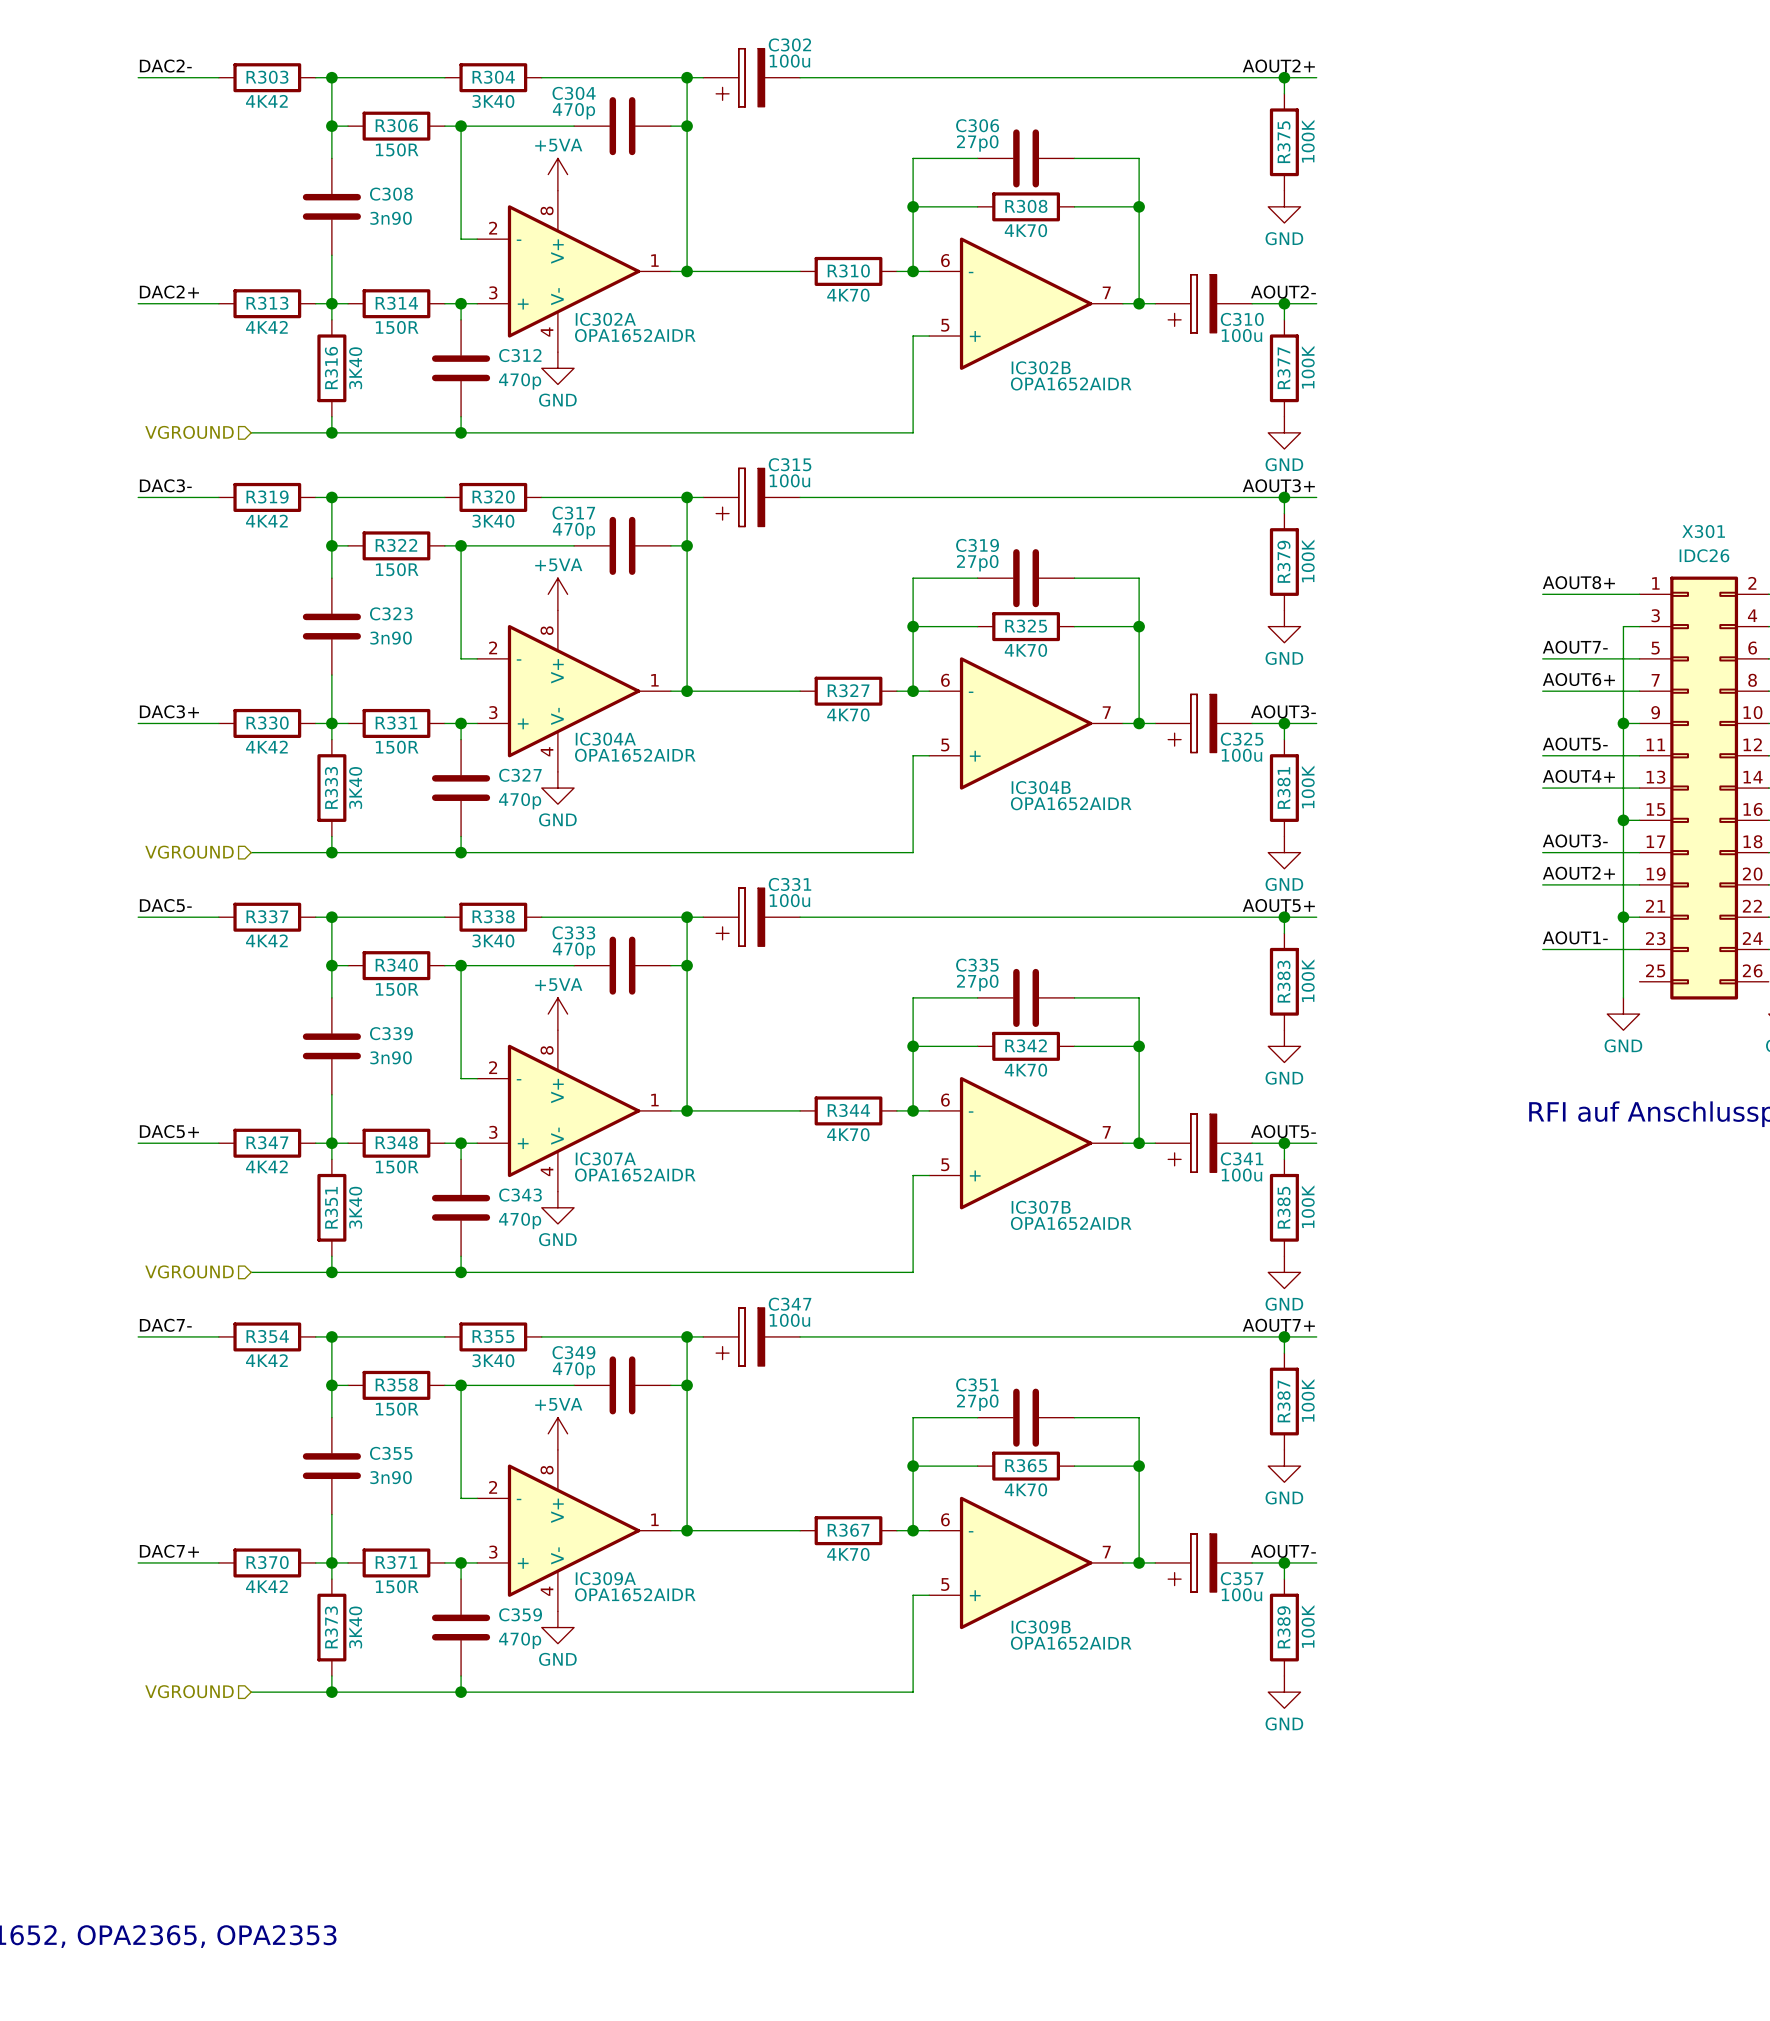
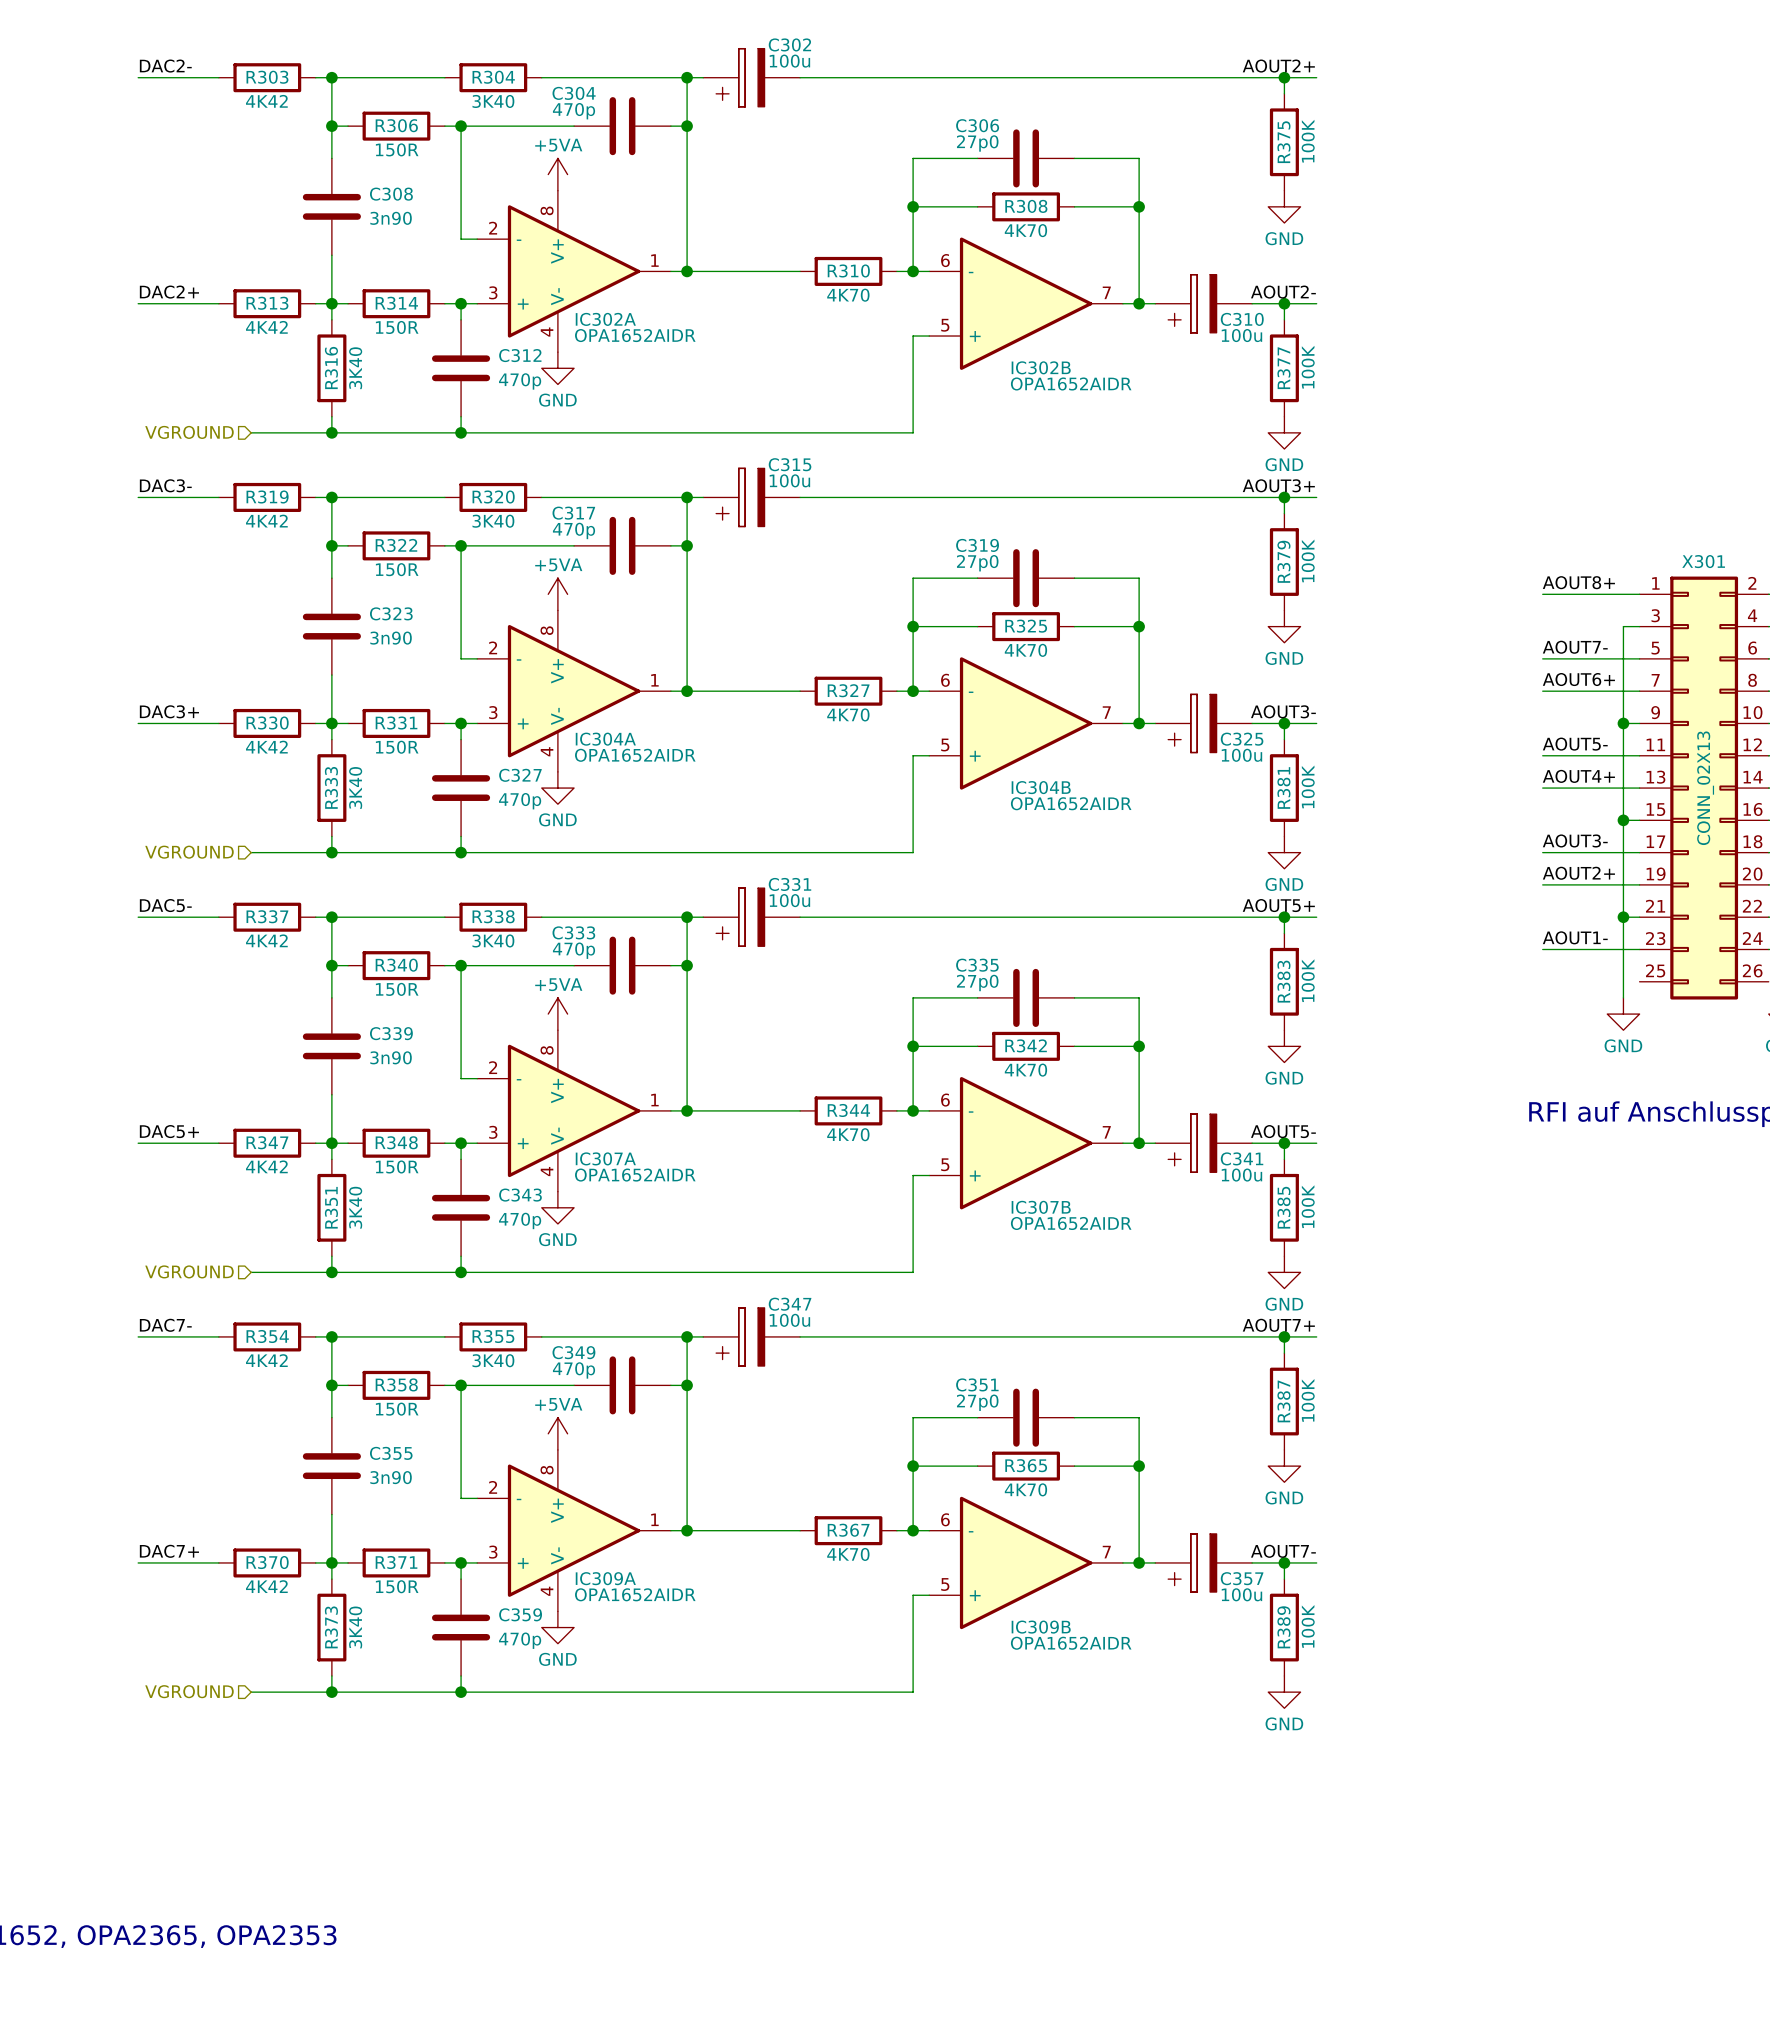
X301 name position: X301 (1703, 531) -> X301 (1703, 561)
X301 text: IDC26 (1704, 555) -> none
X301 value: none -> CONN_02X13 (1705, 788)

